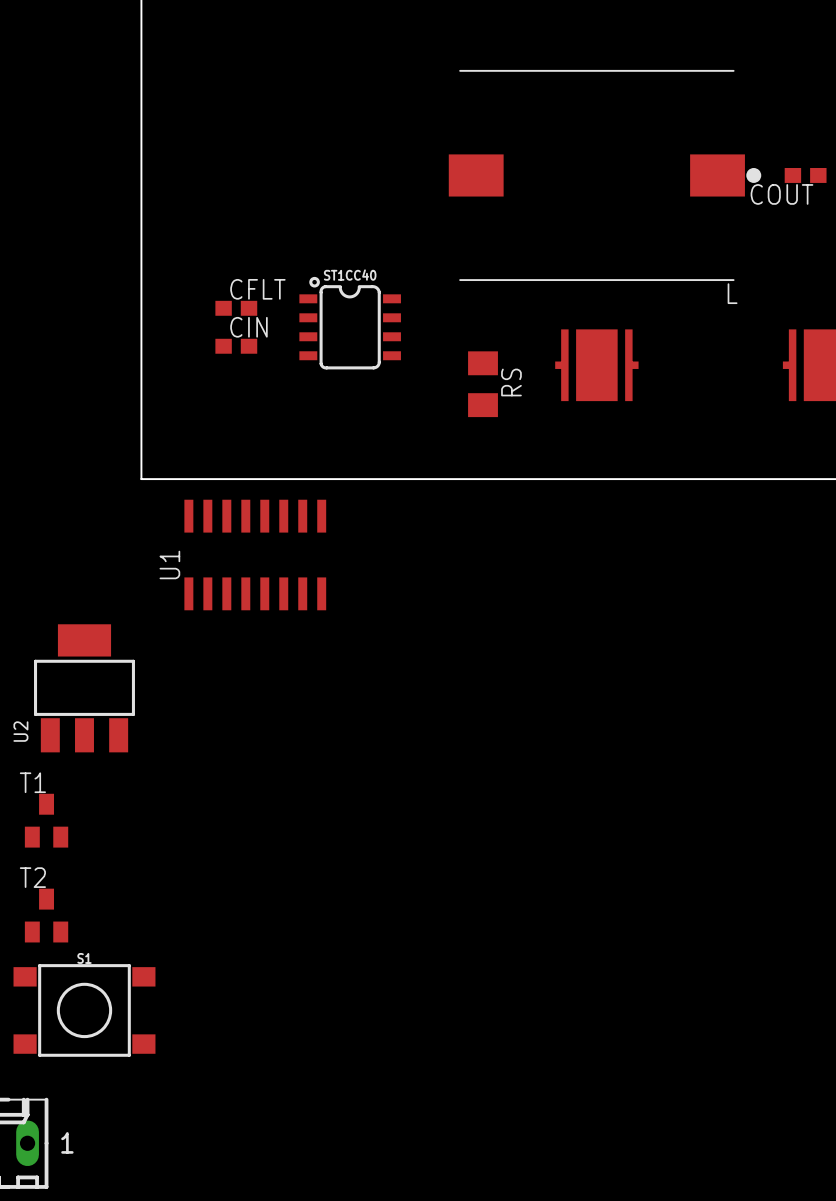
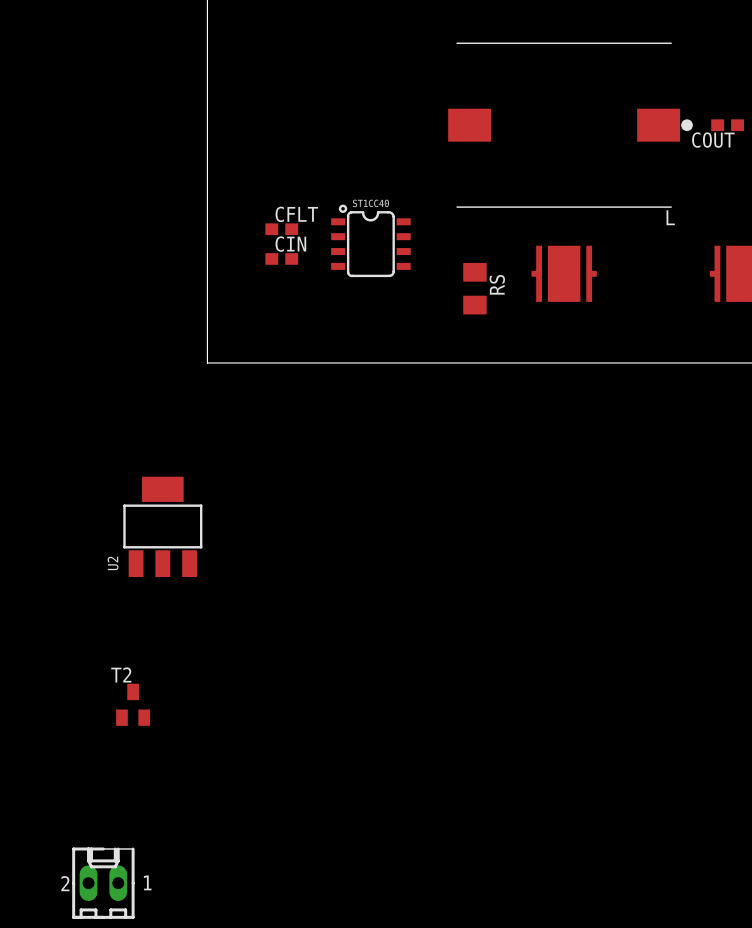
U1: (255, 555) -> none
T1: (46, 820) -> none
S1: (84, 1010) -> none

